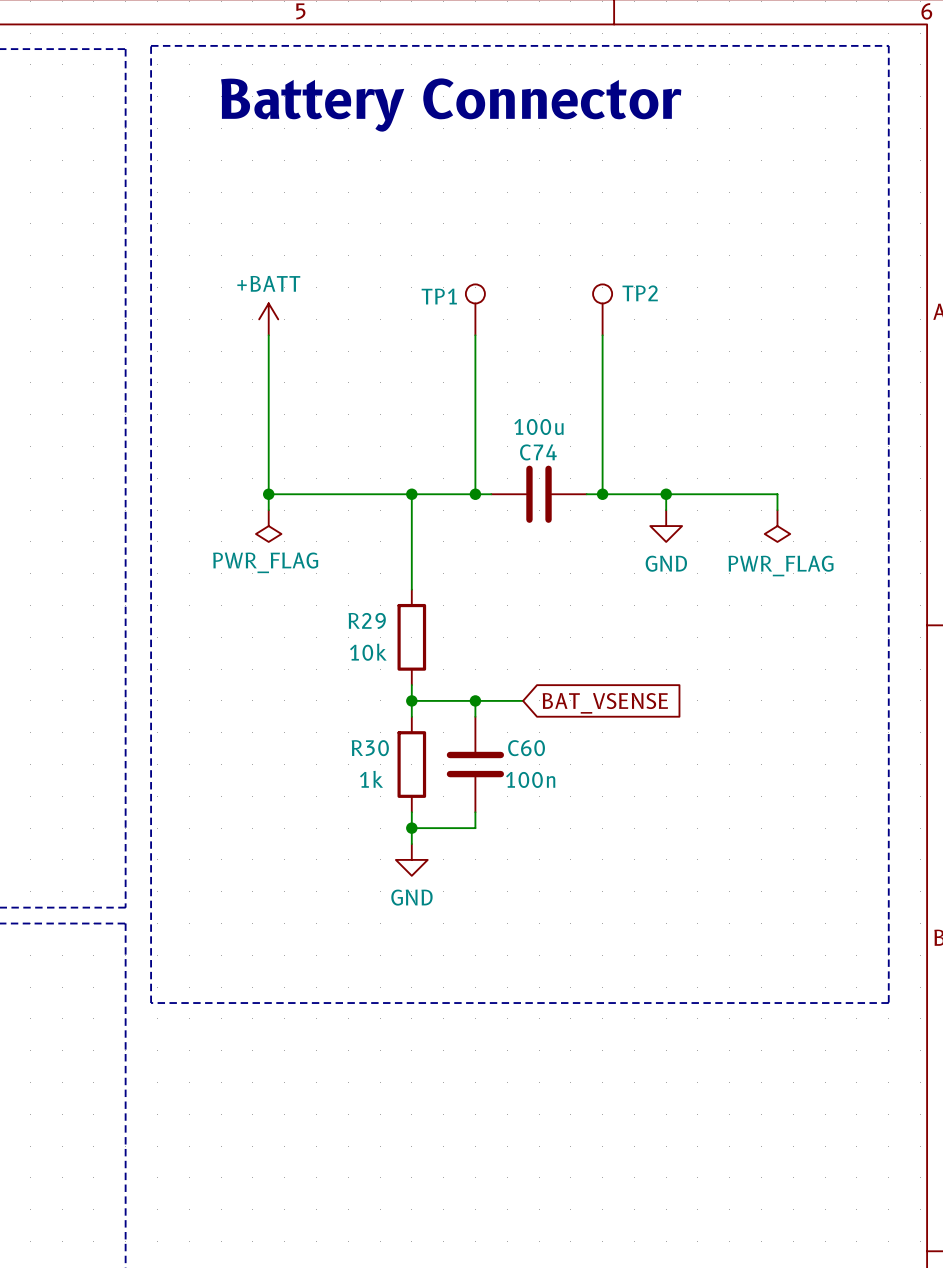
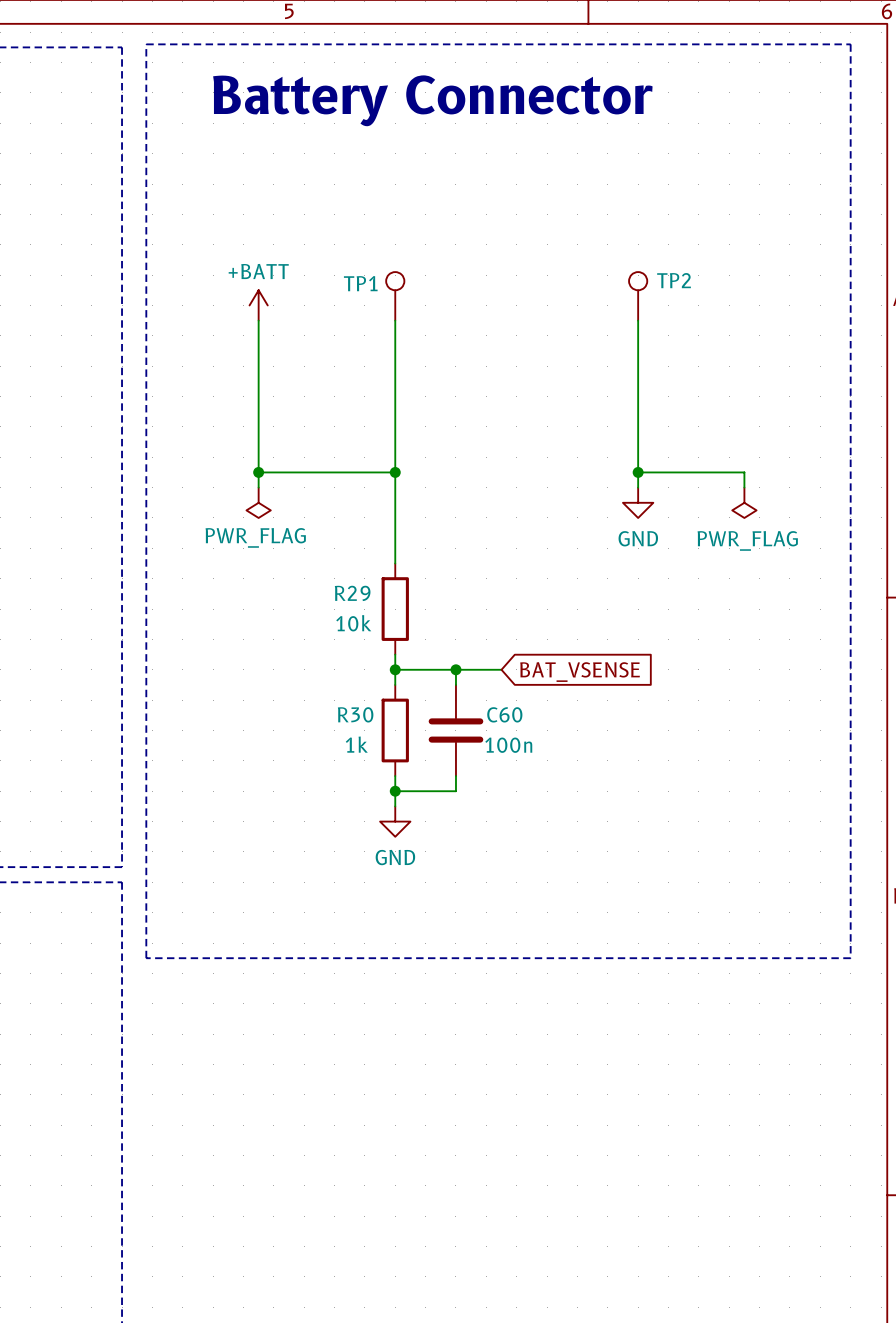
TP1 position: (475, 309) -> (395, 296)
TP2 position: (602, 309) -> (638, 296)
wire: (475, 335) (475, 494) -> none
wire: (602, 335) (602, 494) -> none
wire: (411, 494) (491, 494) -> (395, 472) (395, 320)
junction: (475, 494) -> none
C74: 100u (539, 494) -> none
wire: (586, 494) (666, 494) -> (638, 320) (638, 472)
junction: (602, 494) -> none

